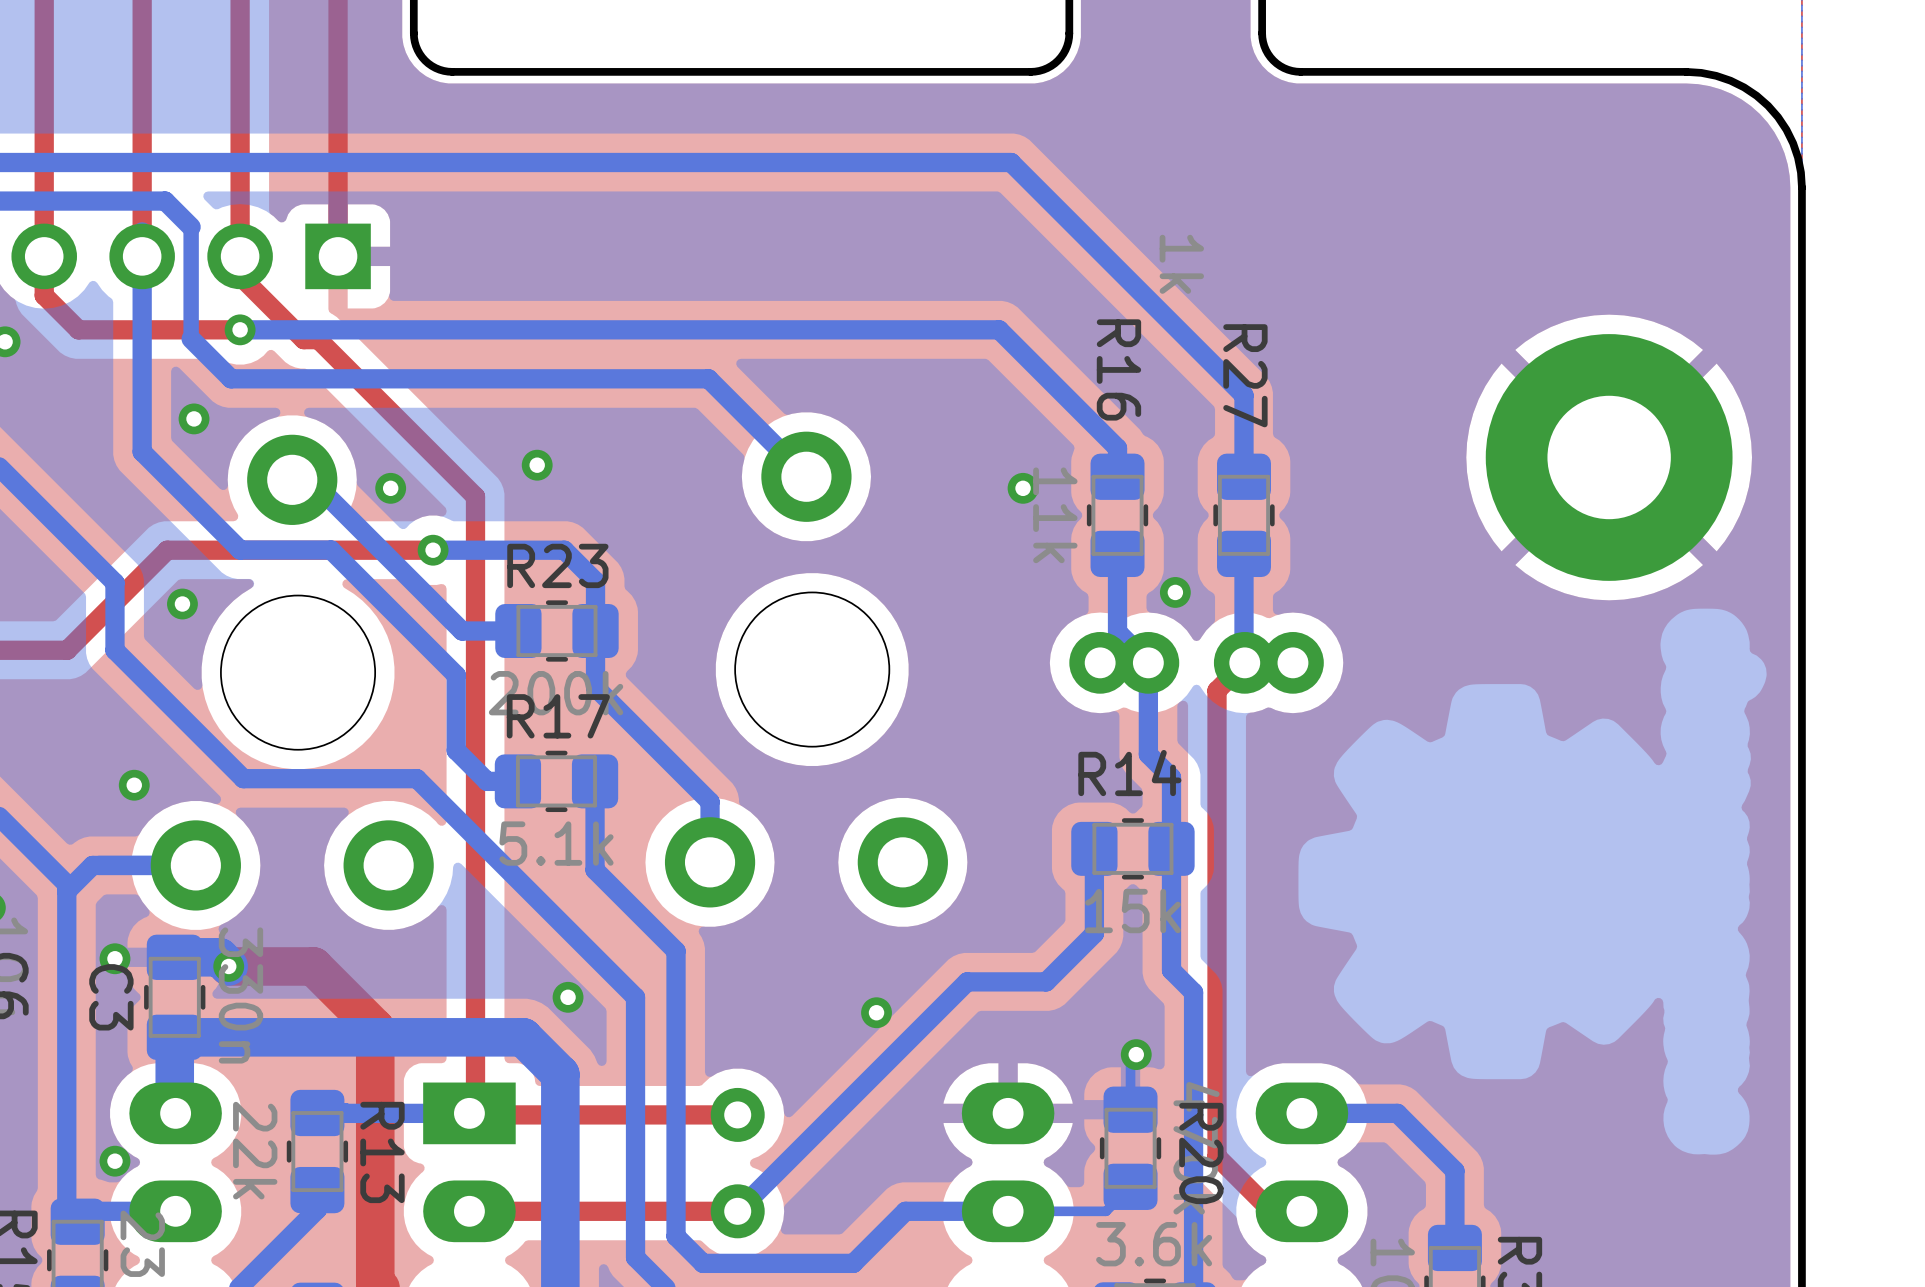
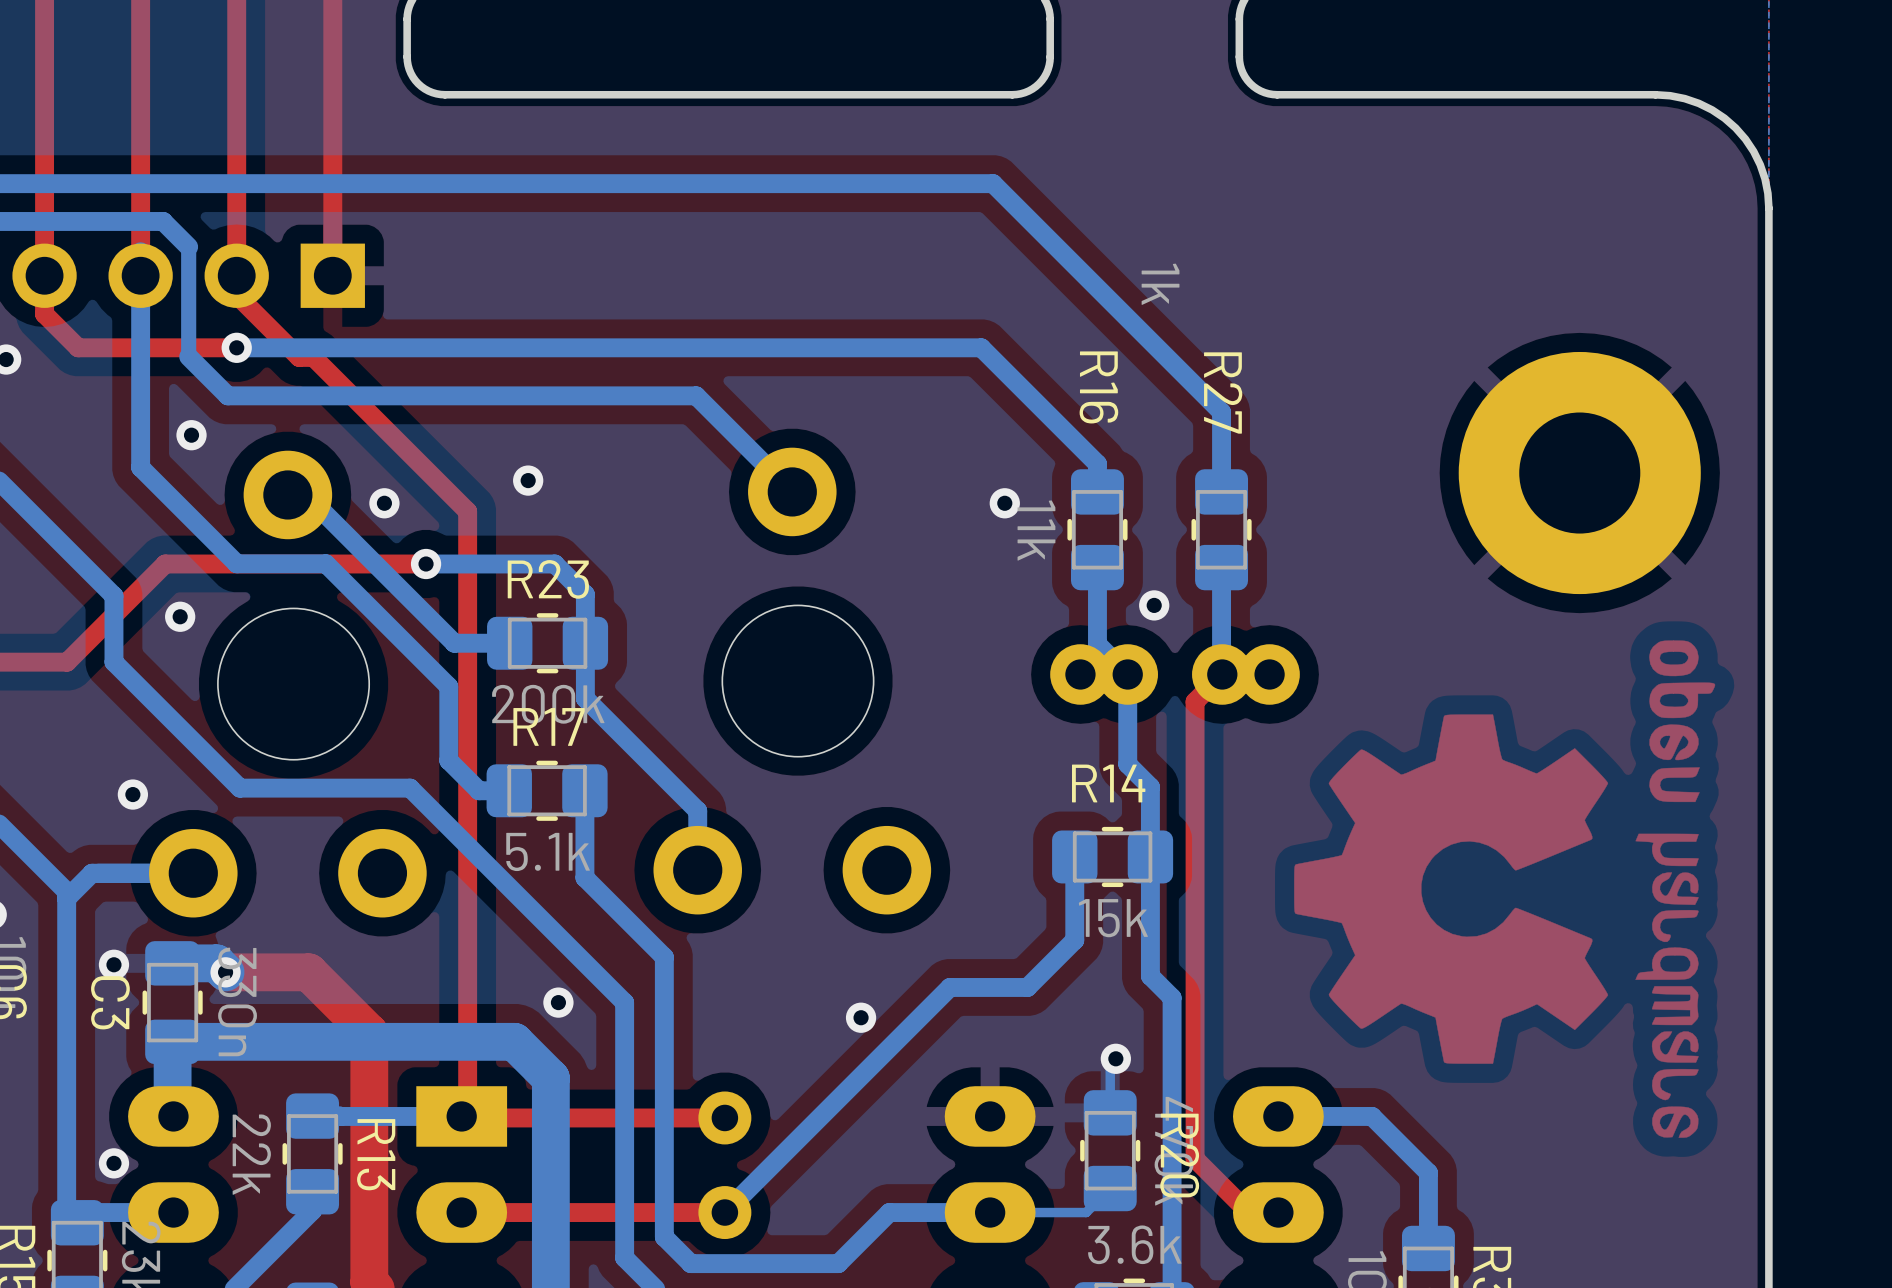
drawing: none -> [1294, 640, 1716, 1138]

